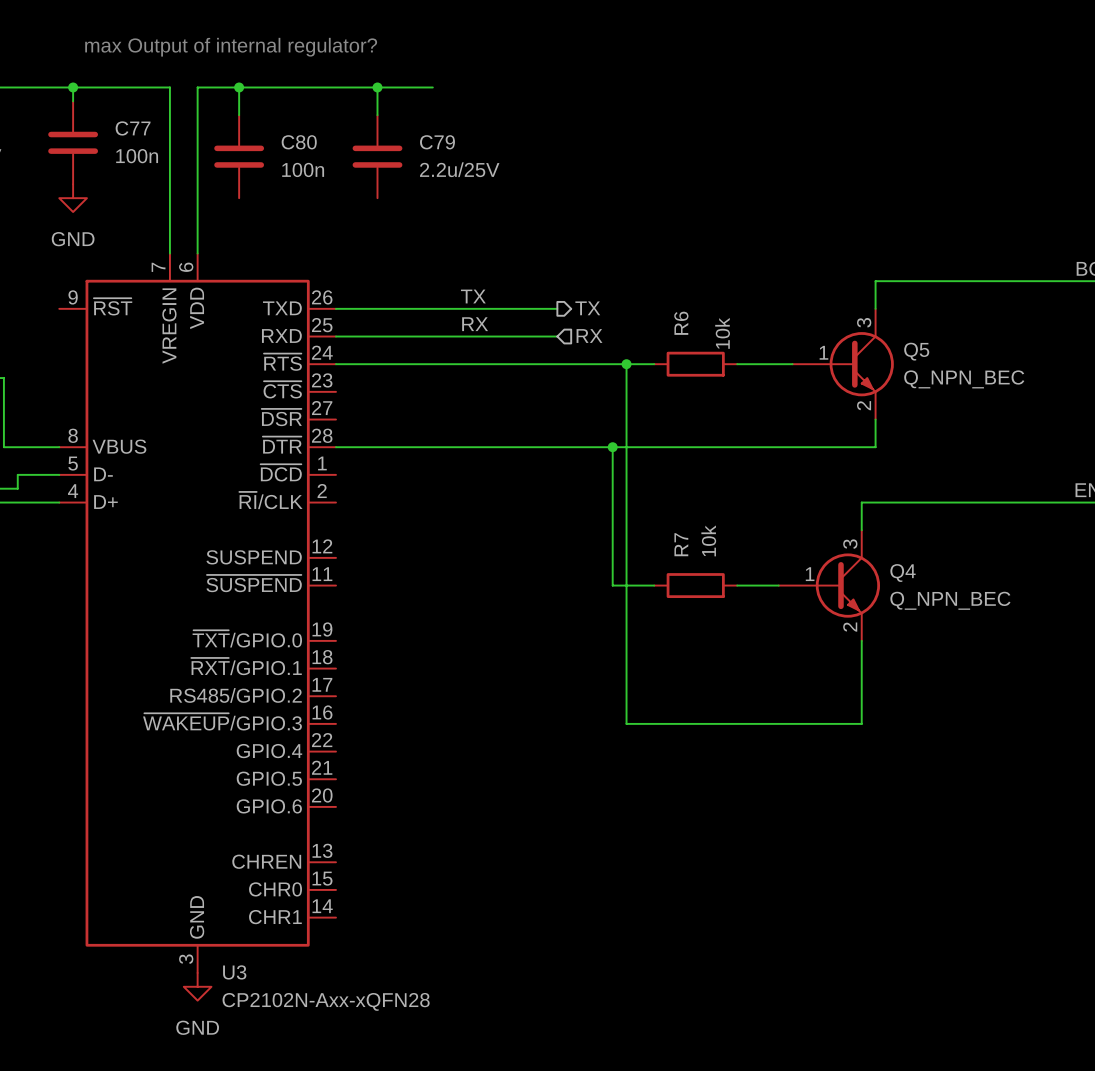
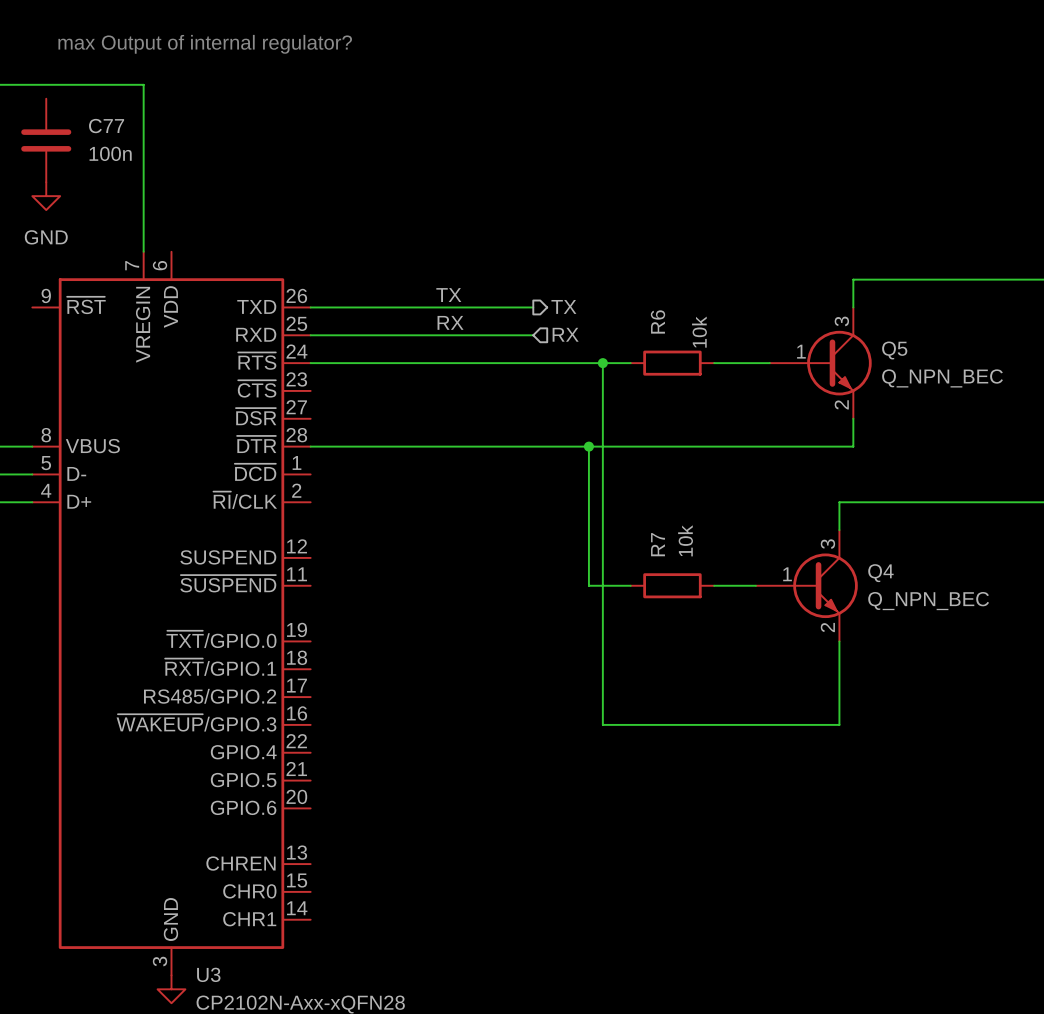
wire: (73, 87) (73, 101) -> none
junction: (73, 87) -> none
wire: (239, 87) (239, 115) -> none
junction: (239, 87) -> none
wire: (377, 87) (377, 115) -> none
junction: (377, 87) -> none
wire: (432, 87) (197, 87) (197, 253) -> none
C80: 100n (239, 156) -> none
C79: 2.2u/25V (377, 156) -> none

